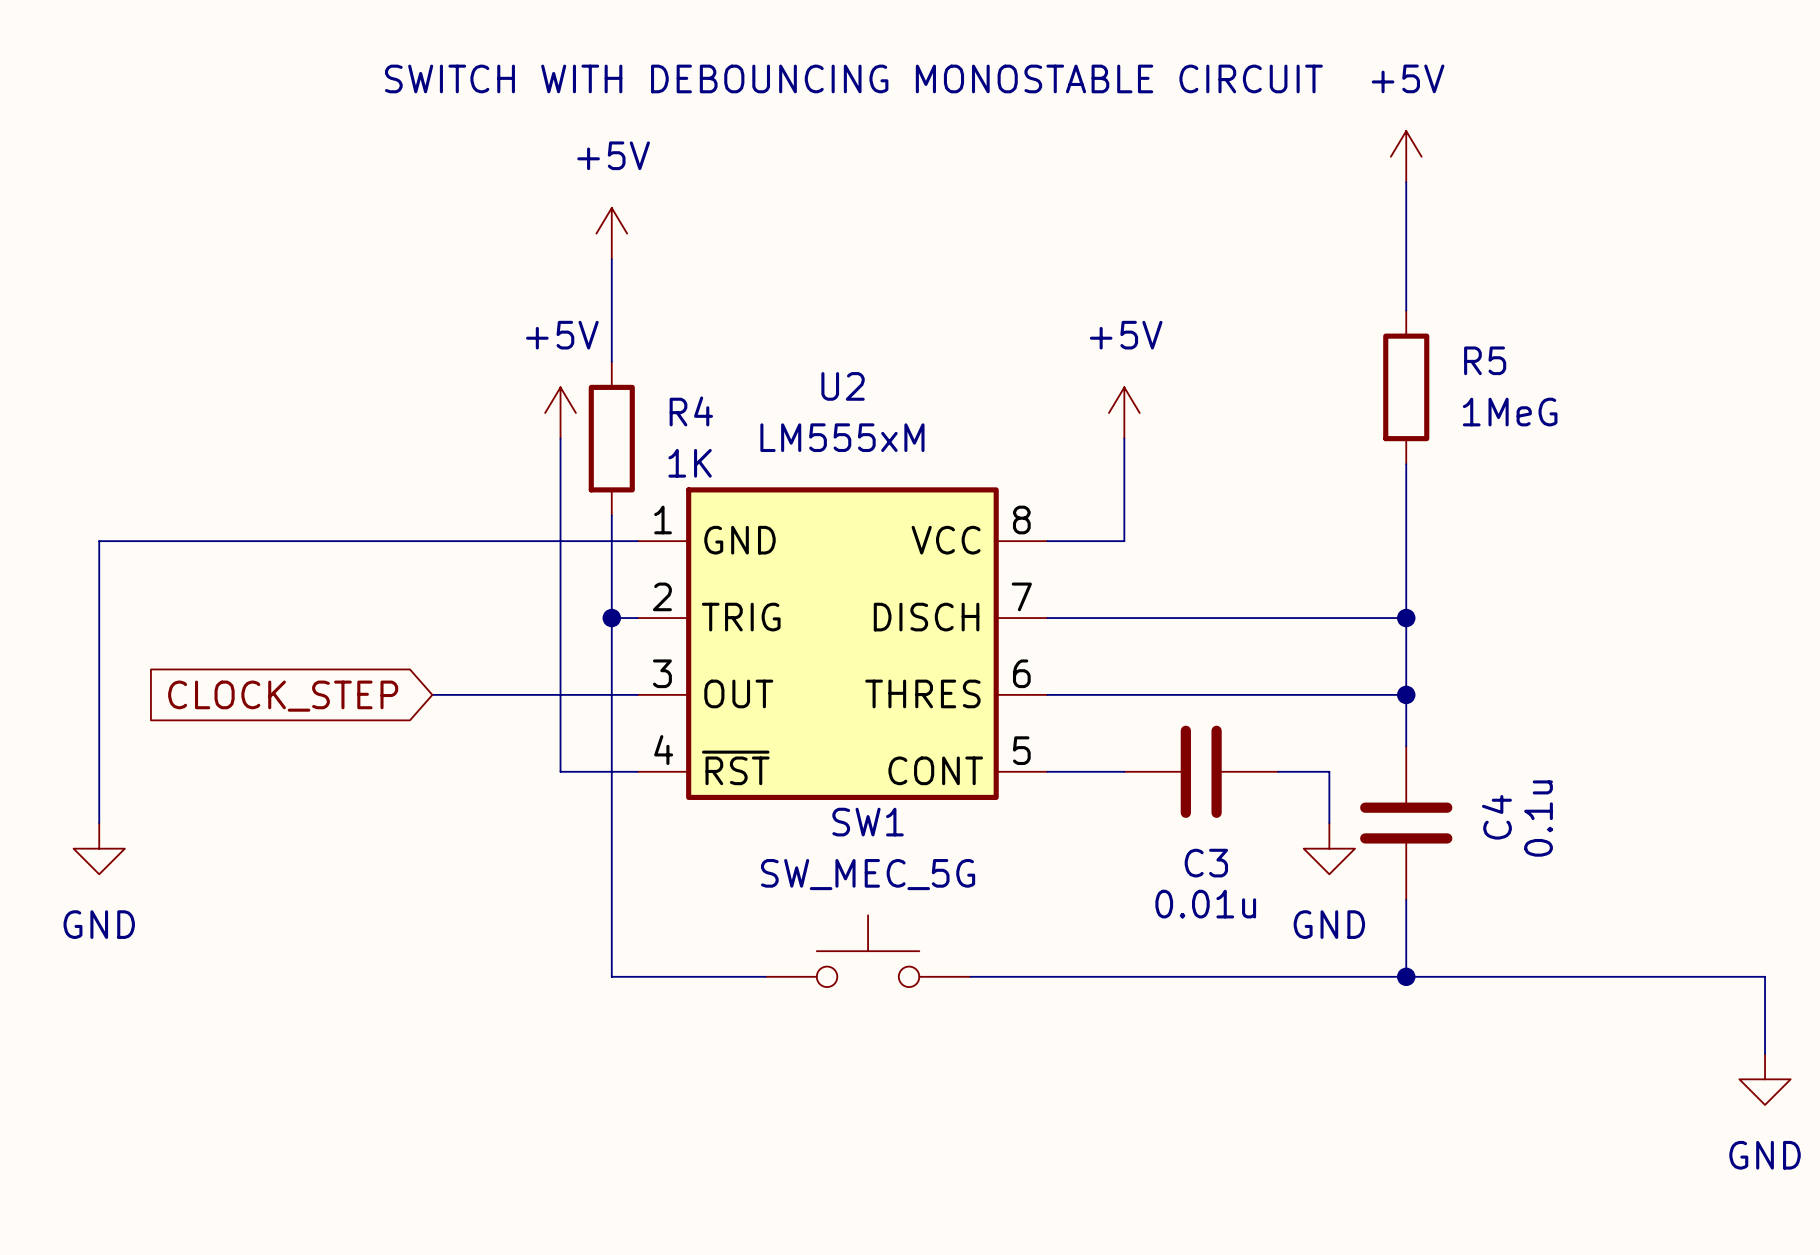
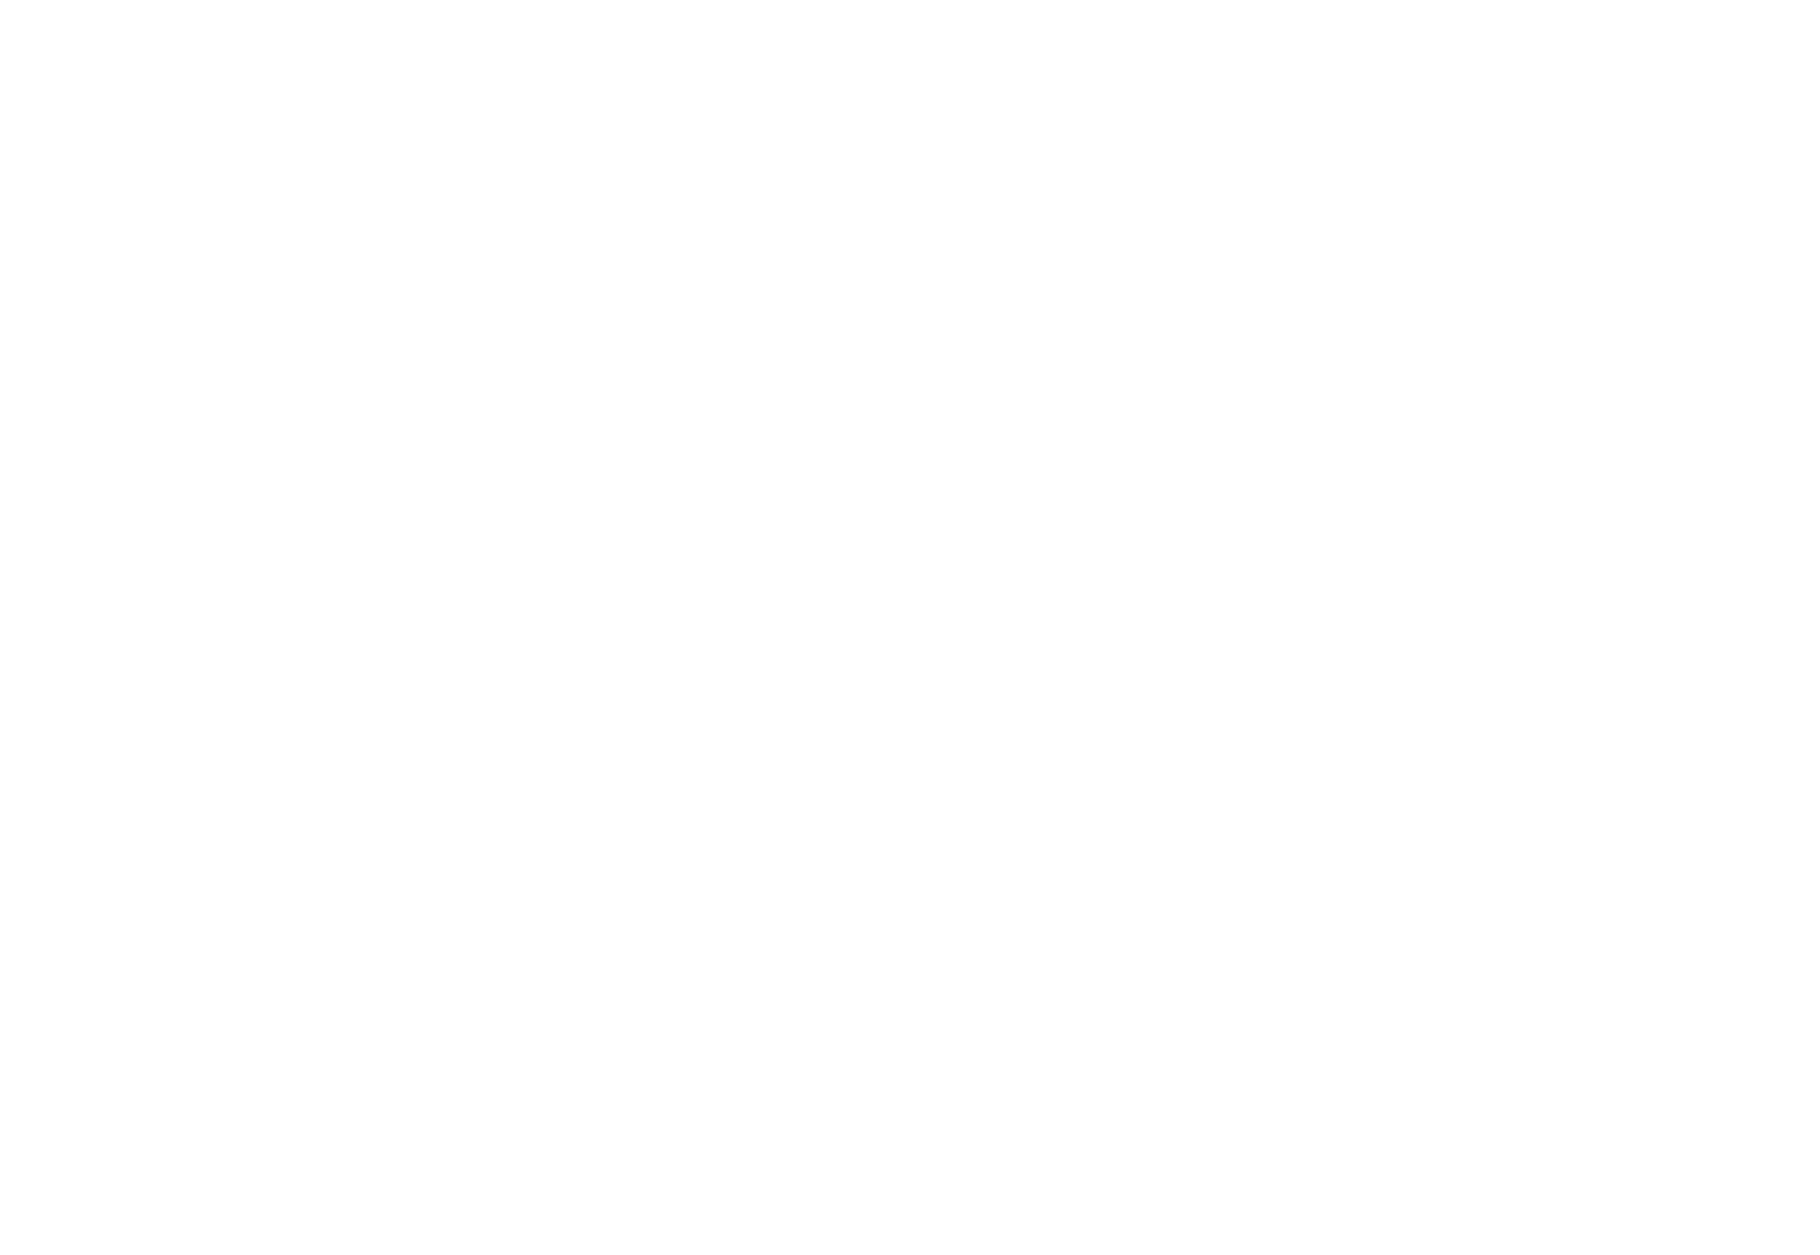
text: SWITCH WITH DEBOUNCING MONOSTABLE CIRCUIT (853, 78) -> none
power symbol: +5V (1406, 156) -> none
wire: (1406, 182) (1406, 310) -> none
power symbol: +5V (611, 233) -> none
wire: (611, 259) (611, 361) -> none
R5: 1MeG (1406, 387) -> none
power symbol: +5V (560, 413) -> none
power symbol: +5V (1124, 413) -> none
wire: (560, 438) (560, 771) (637, 771) -> none
R4: 1K (611, 438) -> none
wire: (1124, 438) (1124, 541) (1047, 541) -> none
wire: (1406, 464) (1406, 746) -> none
wire: (611, 515) (611, 976) (765, 976) -> none
wire: (637, 541) (99, 541) (99, 823) -> none
wire: (611, 618) (637, 618) -> none
junction: (611, 618) -> none
wire: (1047, 618) (1406, 618) -> none
junction: (1406, 618) -> none
U2: LM555xM (842, 643) -> none
wire: (432, 694) (637, 694) -> none
wire: (1047, 694) (1406, 694) -> none
junction: (1406, 694) -> none
global label: CLOCK_STEP (283, 696) -> none
wire: (1047, 771) (1124, 771) -> none
C3: 0.01u (1201, 771) -> none
wire: (1278, 771) (1329, 771) (1329, 823) -> none
C4: 0.1u (1406, 823) -> none
power symbol: GND (99, 848) -> none
power symbol: GND (1329, 848) -> none
wire: (1406, 899) (1406, 976) -> none
SW1: SW_MEC_5G (868, 951) -> none
wire: (970, 976) (1765, 976) (1765, 1053) -> none
junction: (1406, 976) -> none
power symbol: GND (1765, 1079) -> none

